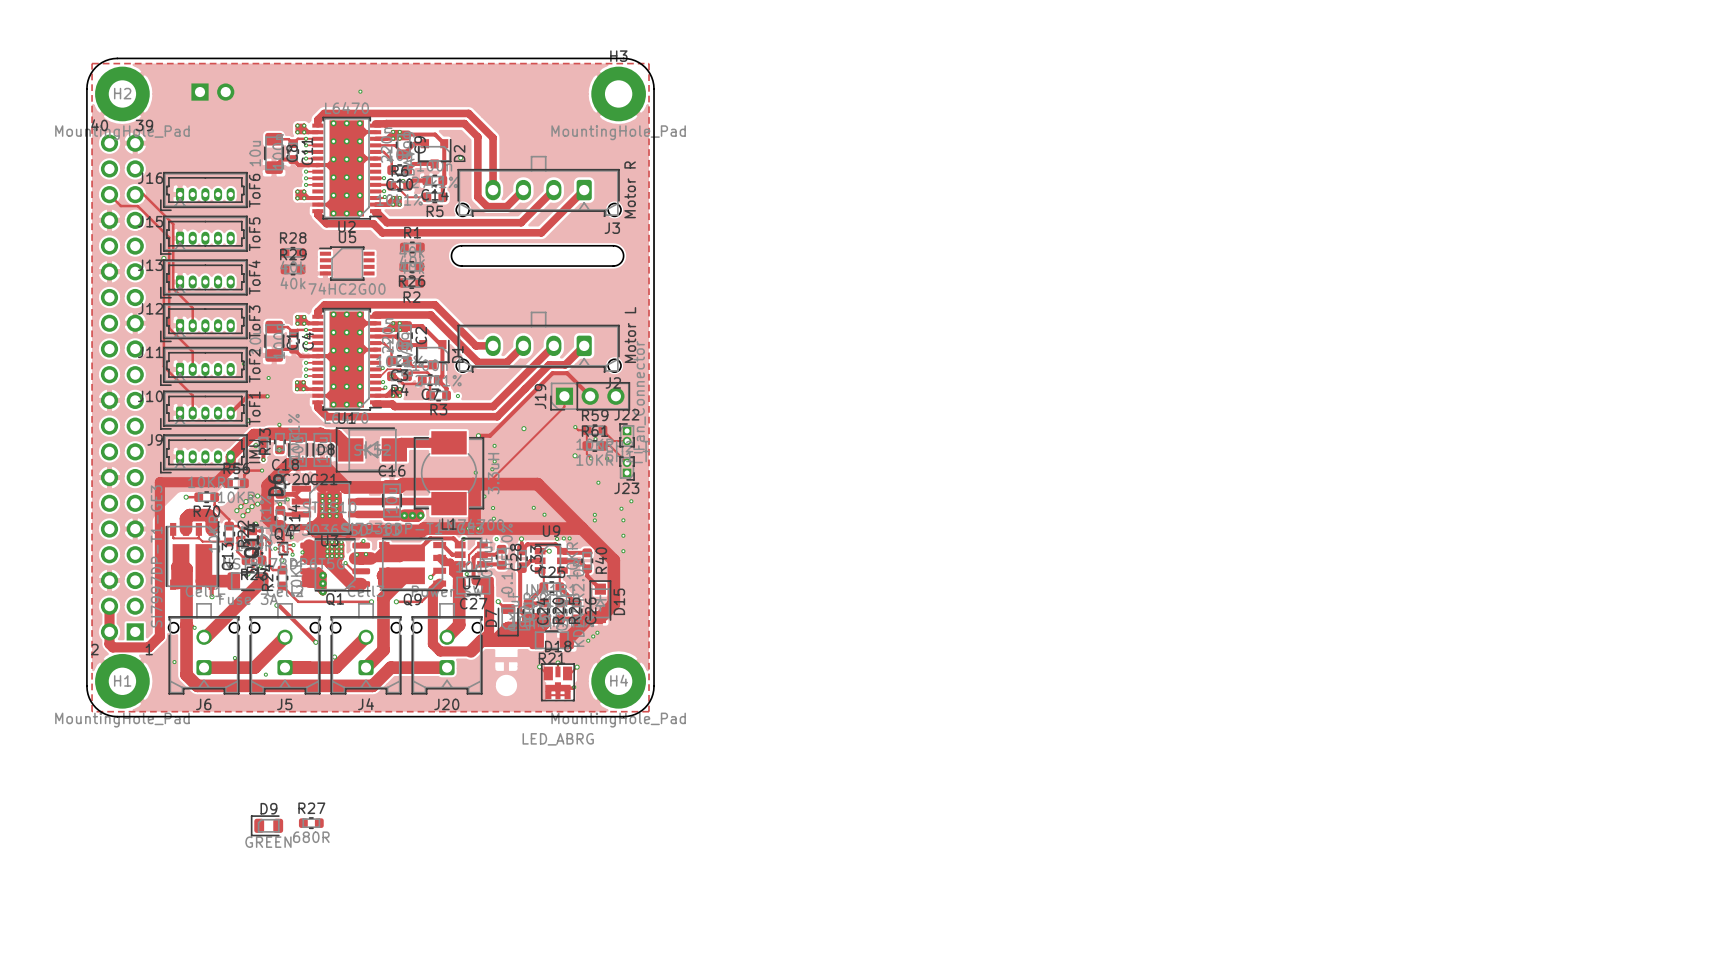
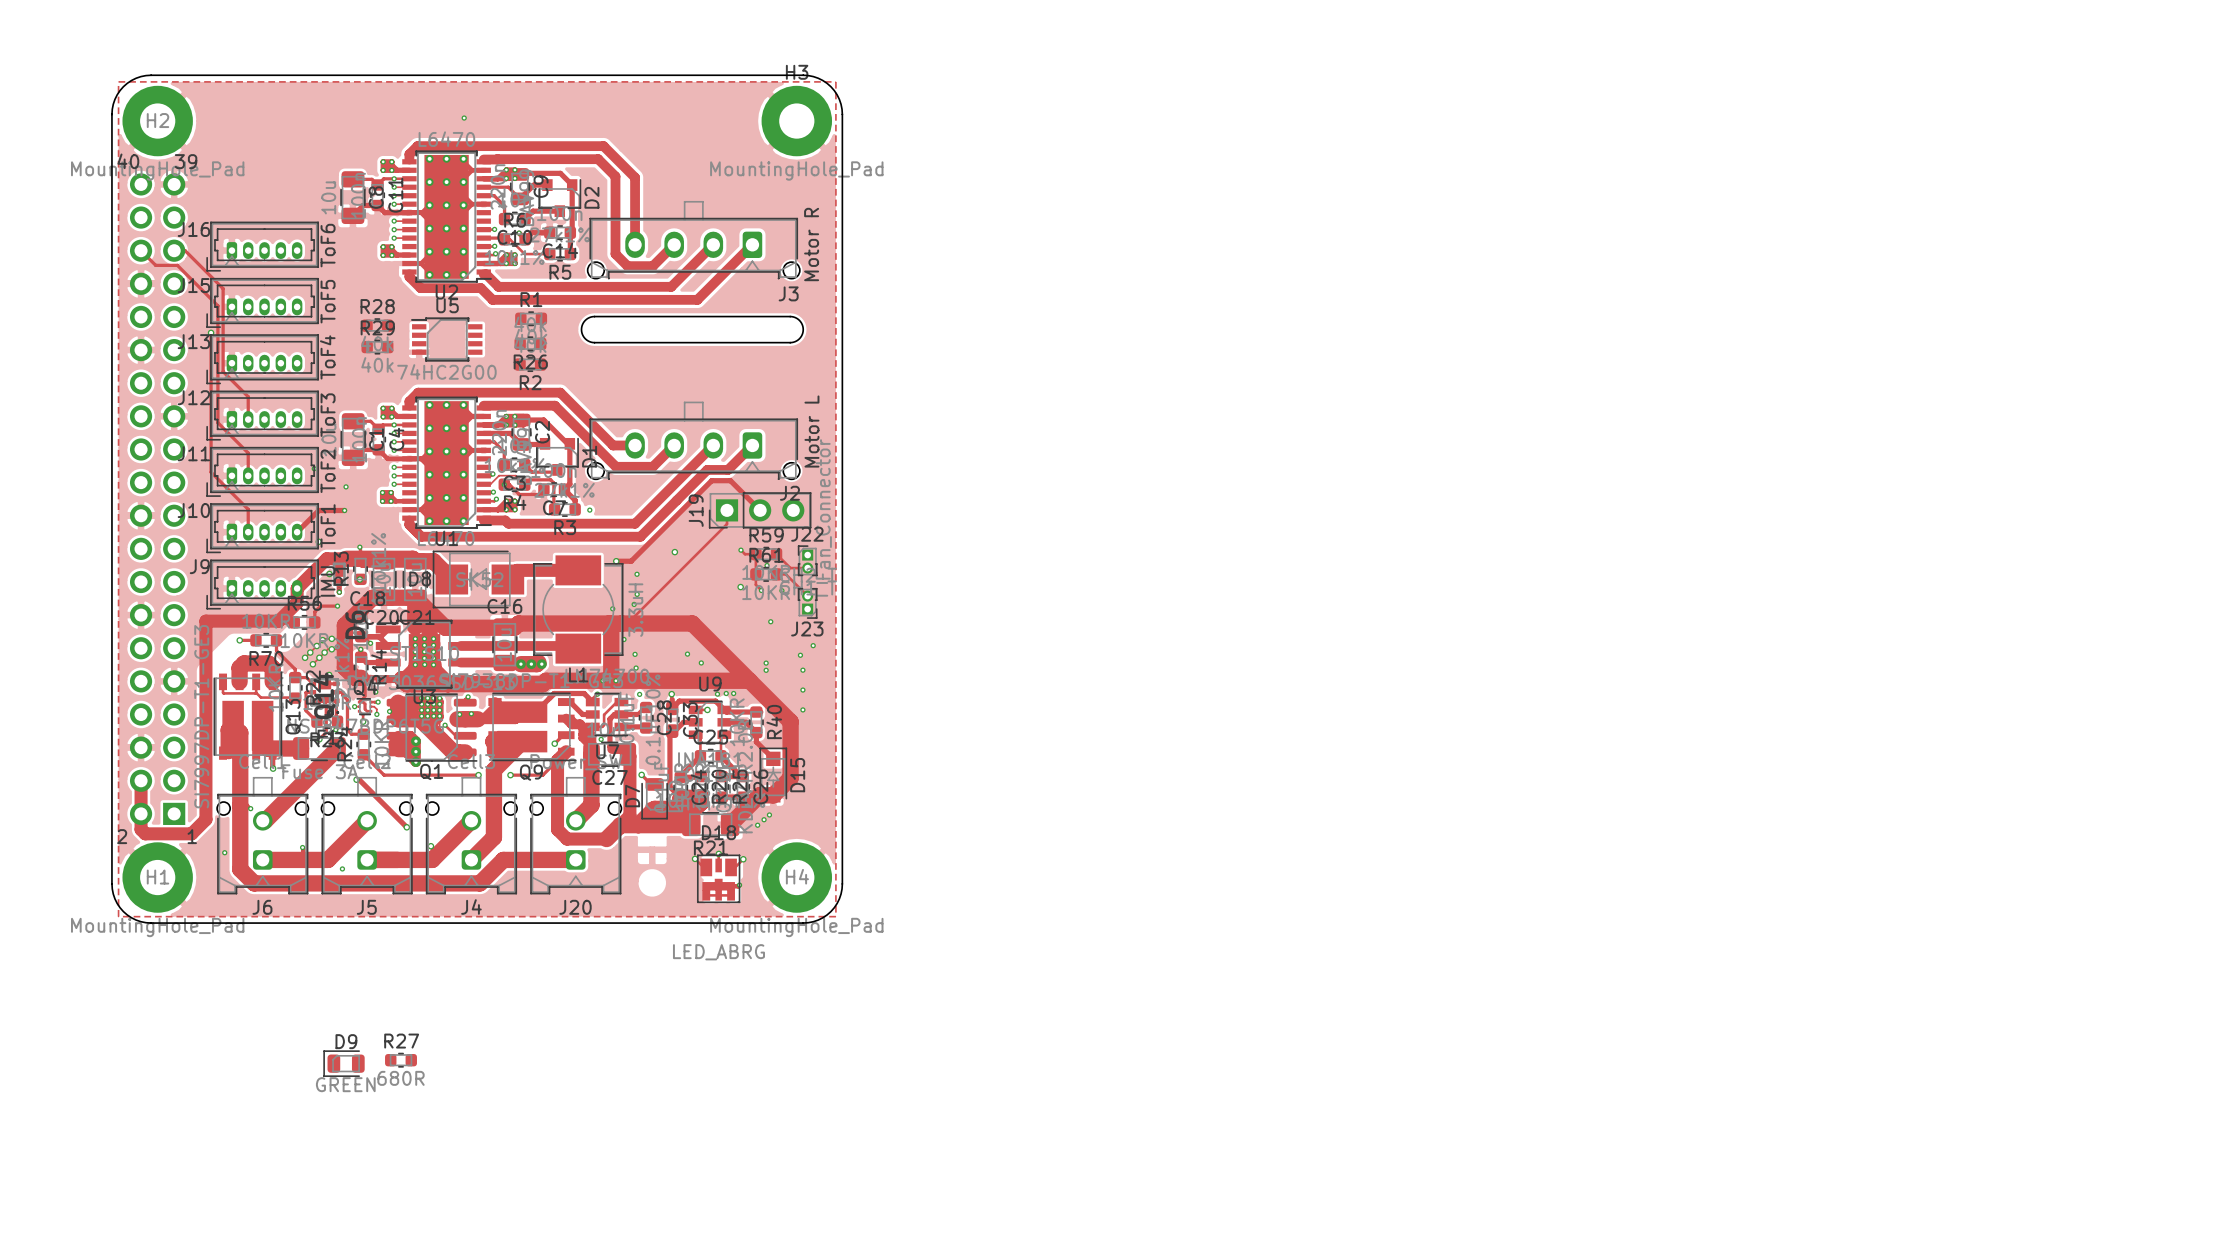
part: (212, 92) -> none
via: (460, 157) -> none

